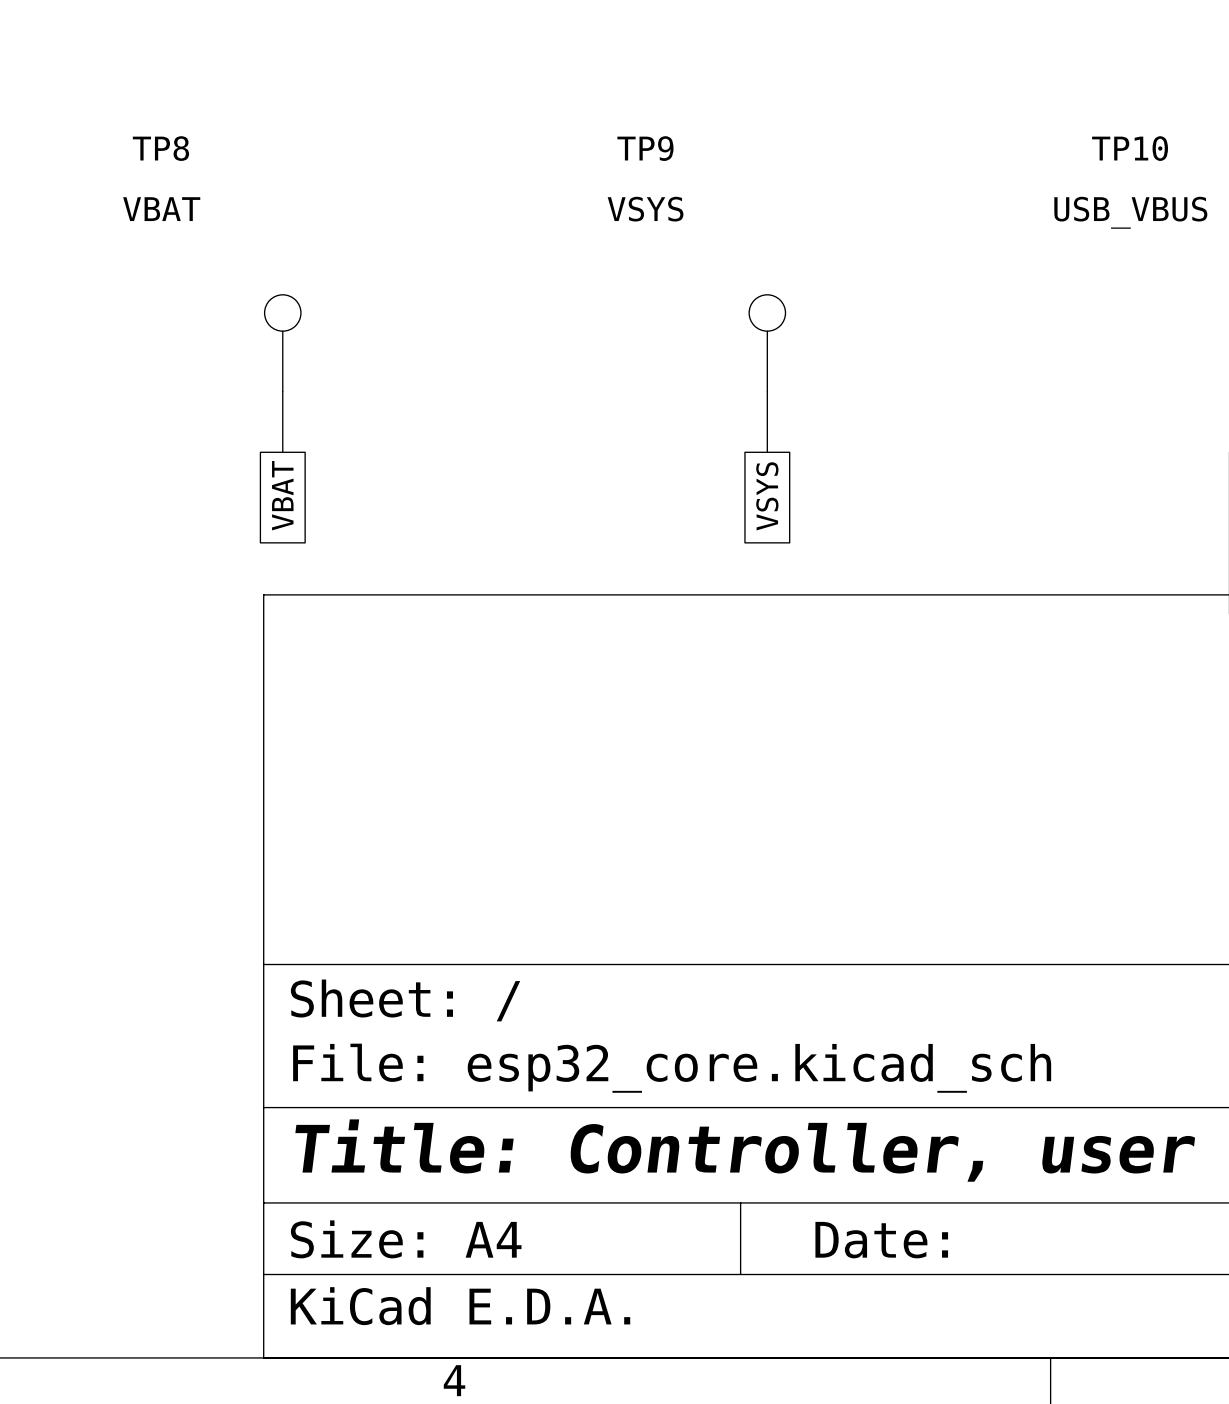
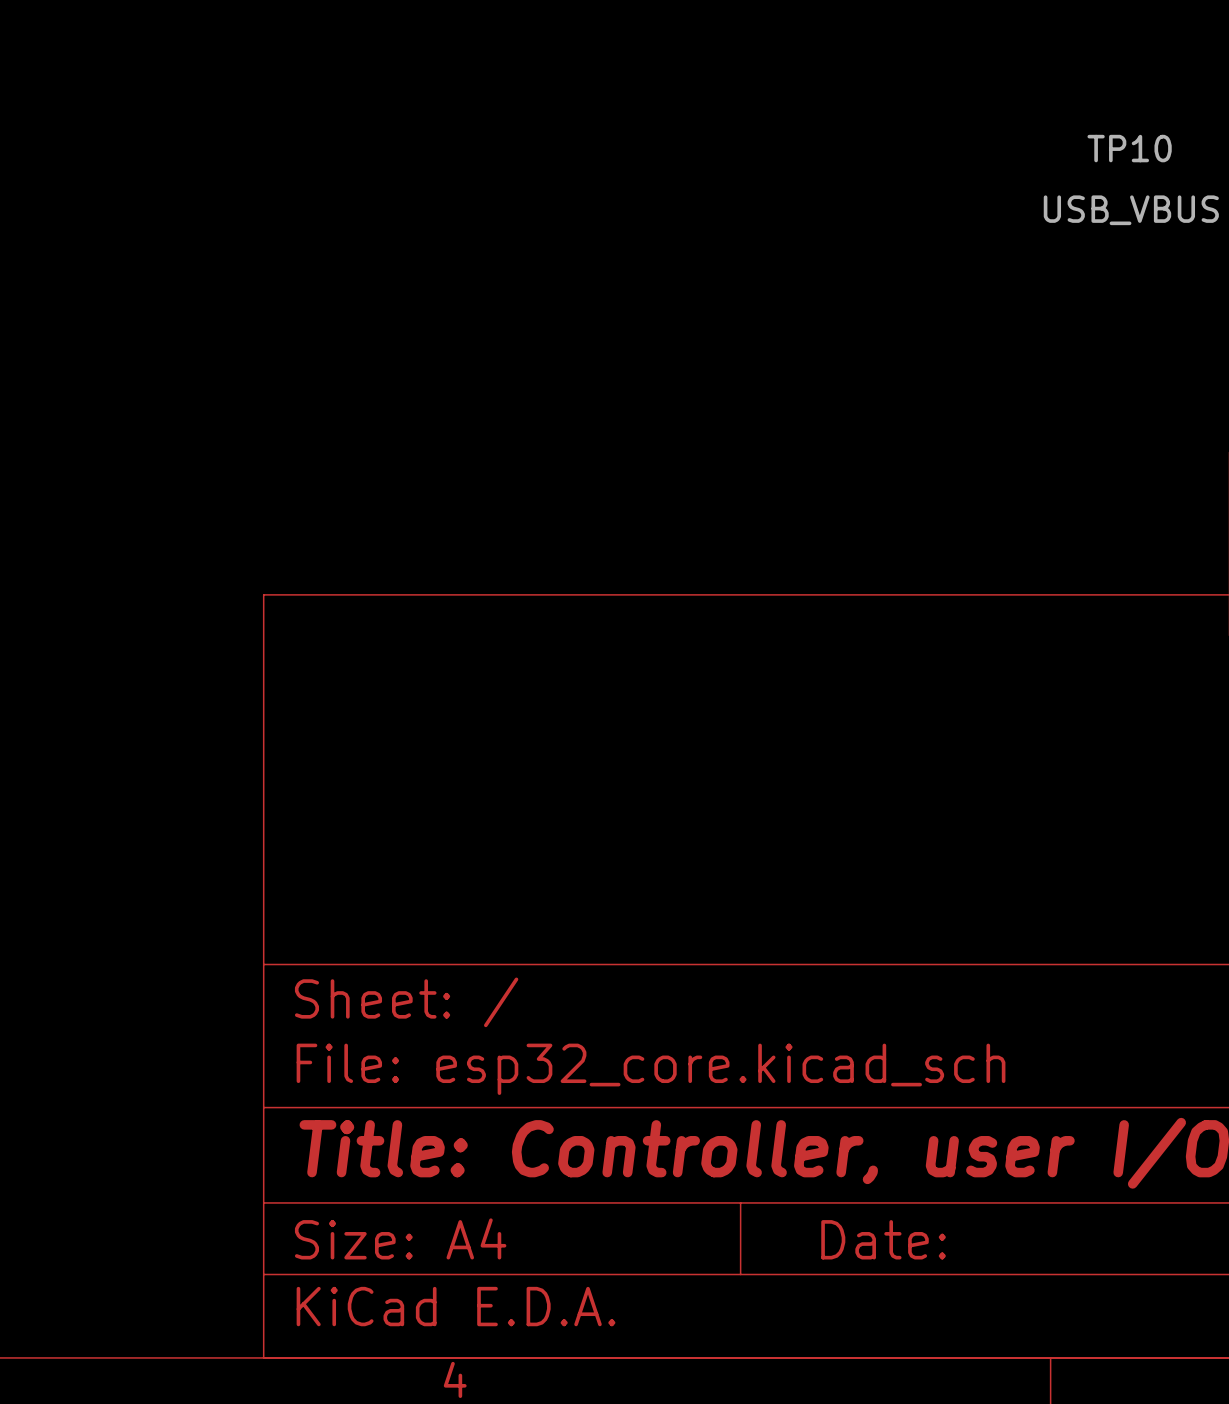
TP8: VBAT (282, 343) -> none
TP9: VSYS (767, 343) -> none
wire: (282, 391) (282, 452) -> none
wire: (767, 391) (767, 452) -> none
global label: VBAT (282, 495) -> none
global label: VSYS (767, 496) -> none

